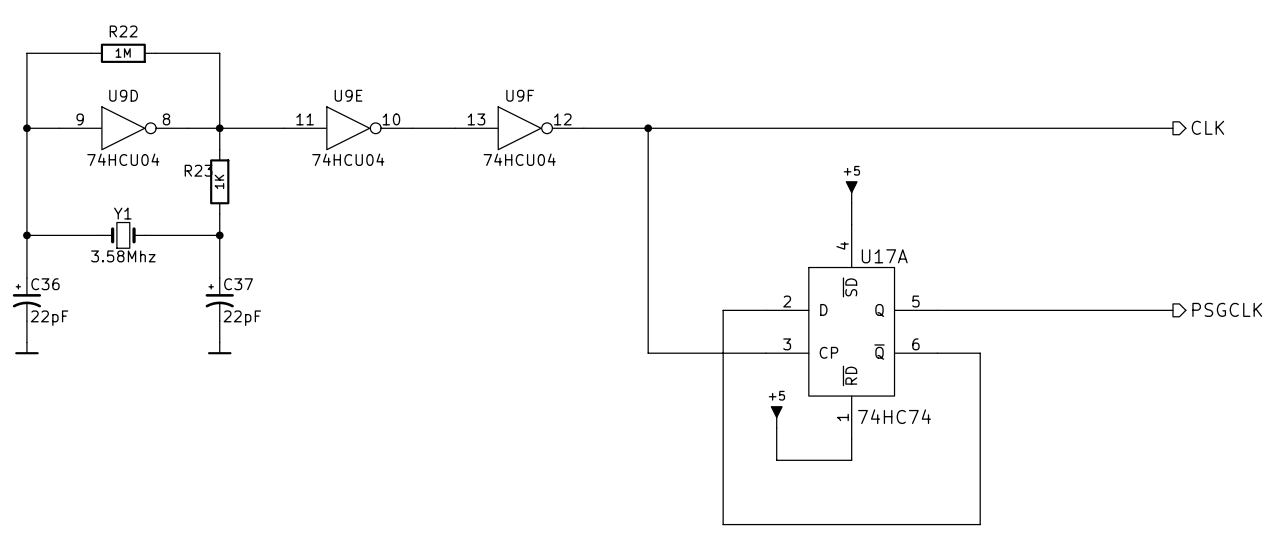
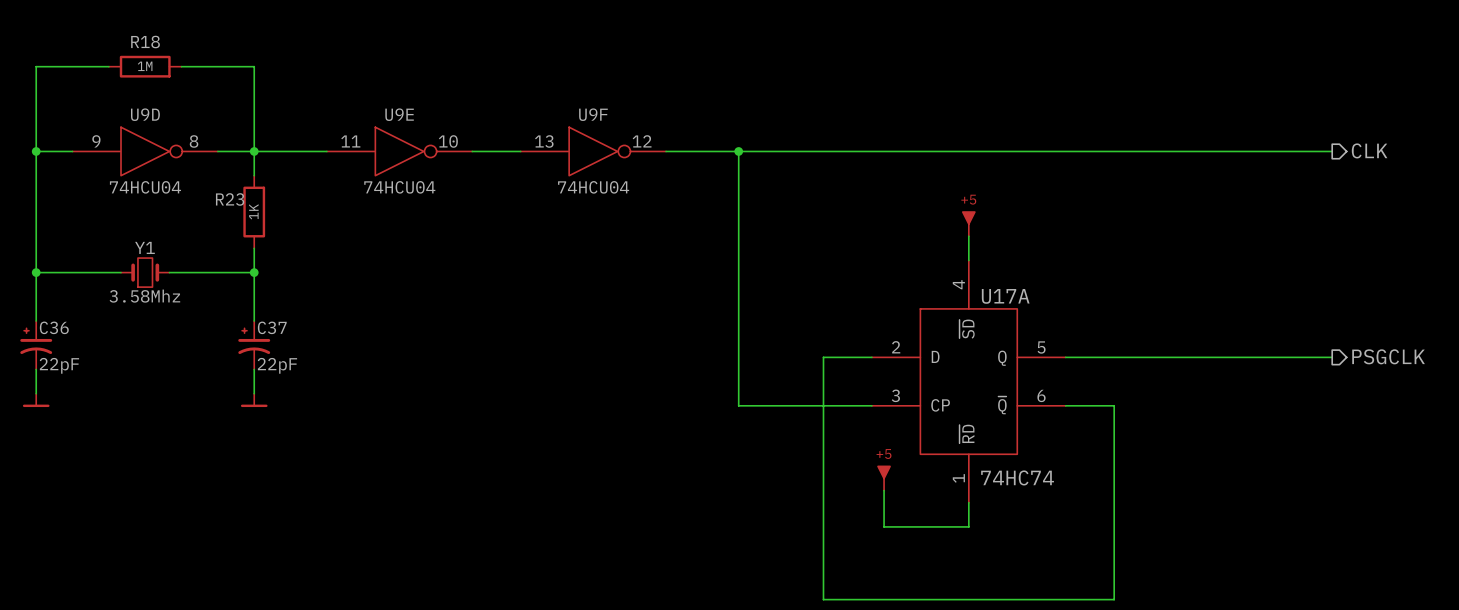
R22 name: R22 (123, 31) -> R18 (145, 42)

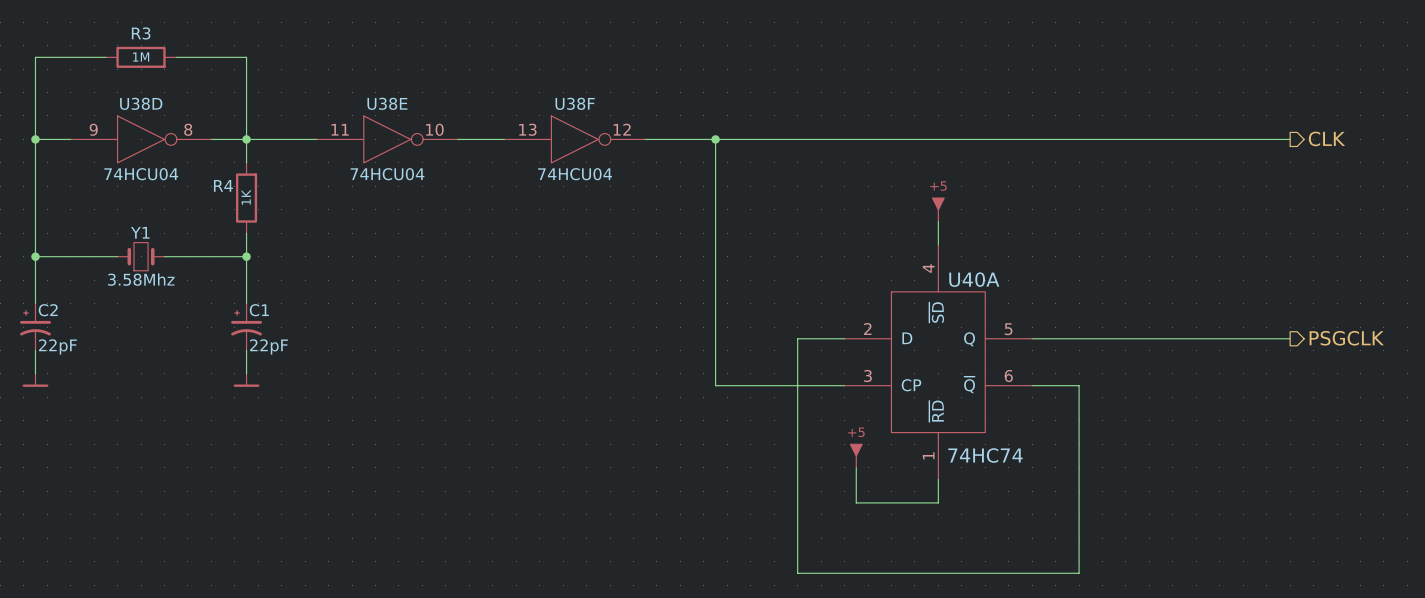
R18 name: R18 (145, 42) -> R3 (141, 33)
U9D name: U9D (145, 114) -> U38D (141, 103)
U9E name: U9E (399, 114) -> U38E (387, 103)
U9F name: U9F (593, 114) -> U38F (575, 103)
R23 name: R23 (230, 199) -> R4 (223, 185)
U17A name: U17A (1005, 296) -> U40A (974, 279)
C36 name: C36 (54, 327) -> C2 (48, 310)
C37 name: C37 (272, 327) -> C1 (259, 310)

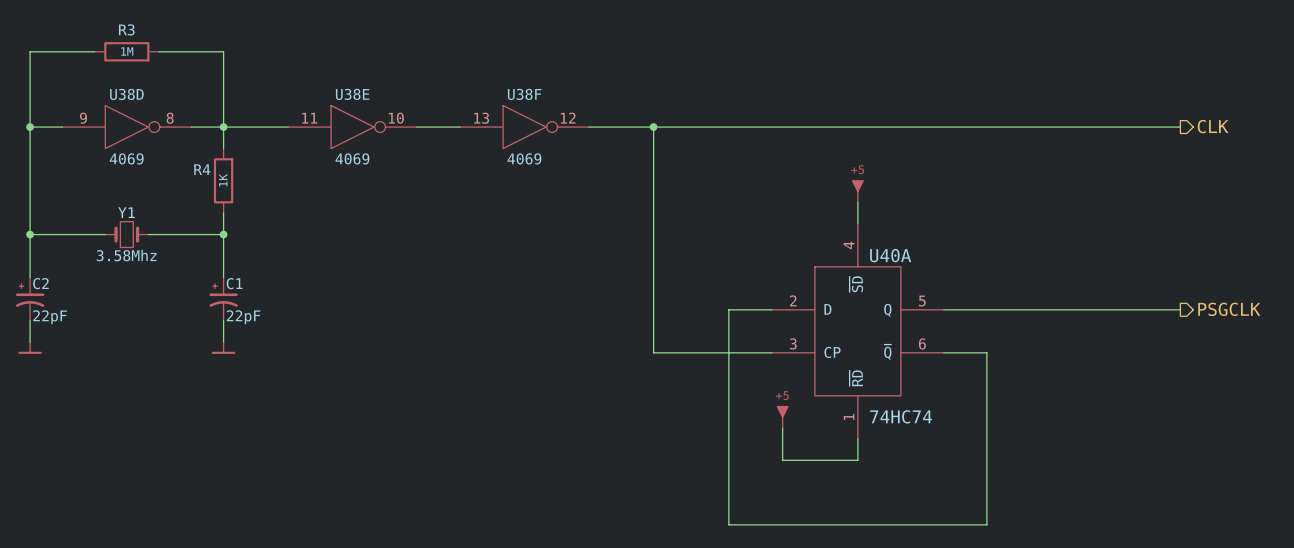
U38D value: 74HCU04 (141, 174) -> 4069 (126, 158)
U38E value: 74HCU04 (387, 174) -> 4069 (352, 158)
U38F value: 74HCU04 (575, 174) -> 4069 (524, 158)

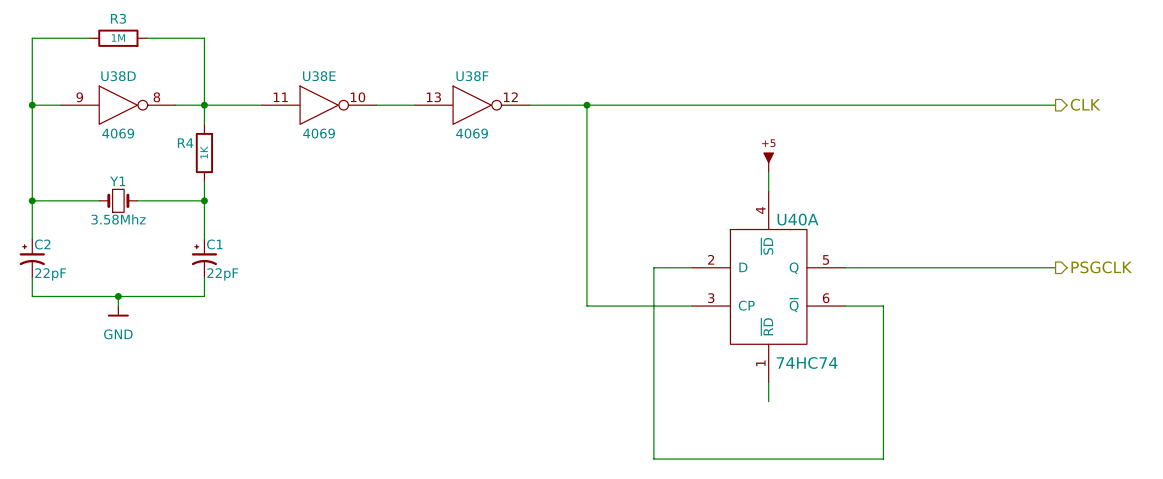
wire: none -> (32, 296) (204, 296)
wire: none -> (118, 296) (118, 306)
junction: none -> (118, 296)
power symbol: (30, 347) -> none
power symbol: (223, 347) -> none
power symbol: none -> GND (118, 311)
power symbol: (782, 417) -> none
wire: (782, 428) (782, 460) (857, 460) -> none

